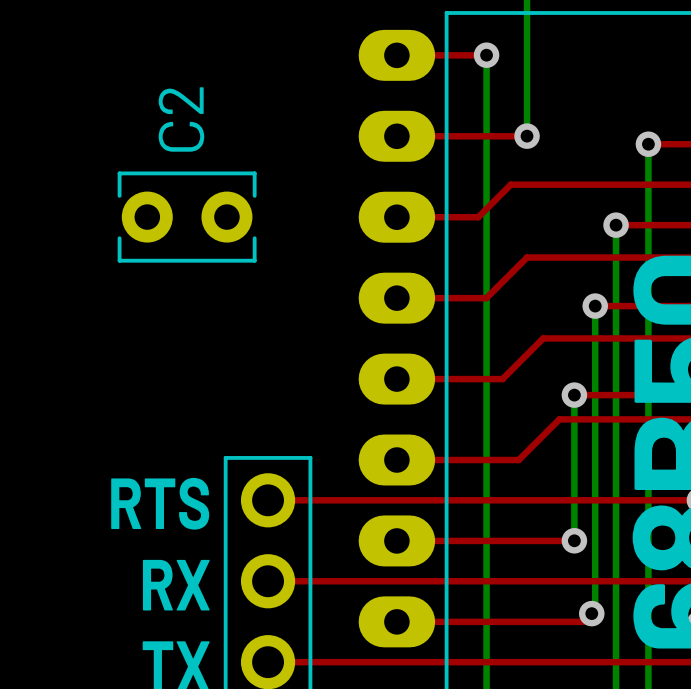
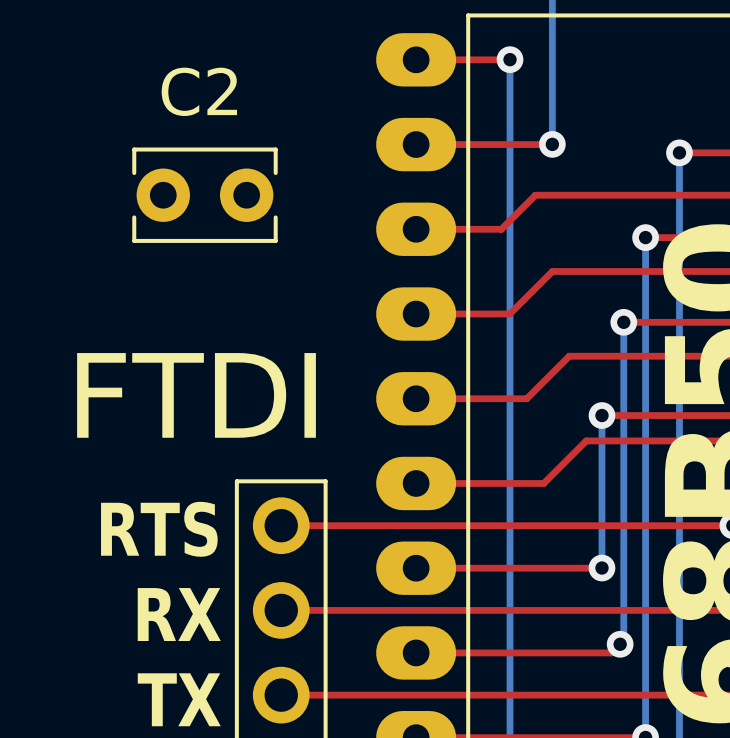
C2 name rotation: 0° (181, 119) -> 90° clockwise (199, 91)
C2 position: (187, 217) -> (204, 195)
text: none -> FTDI (196, 395)

